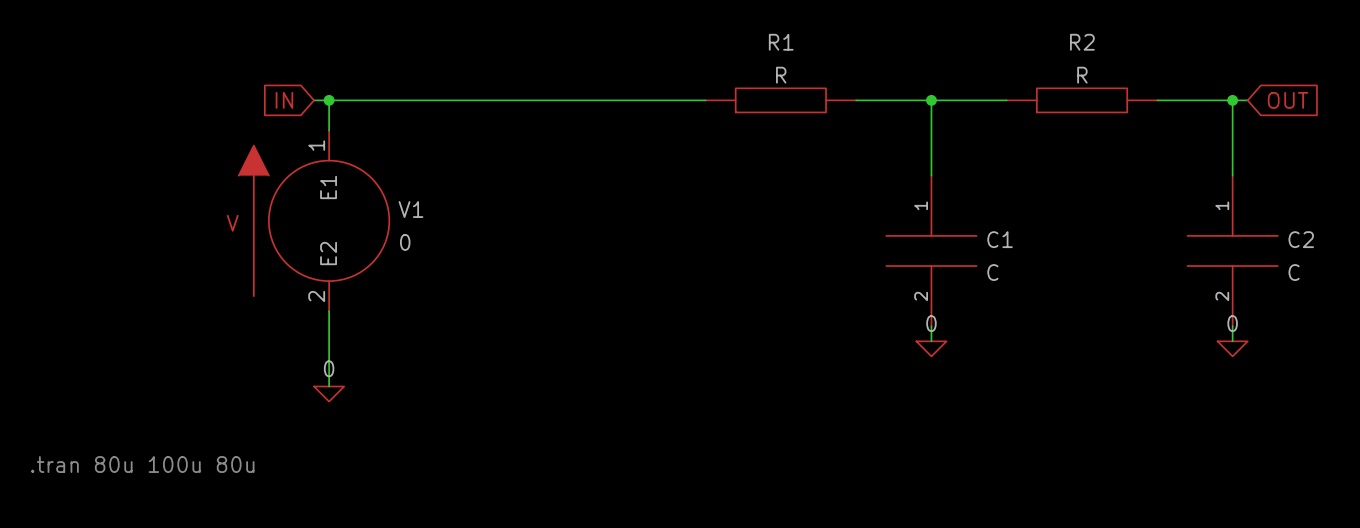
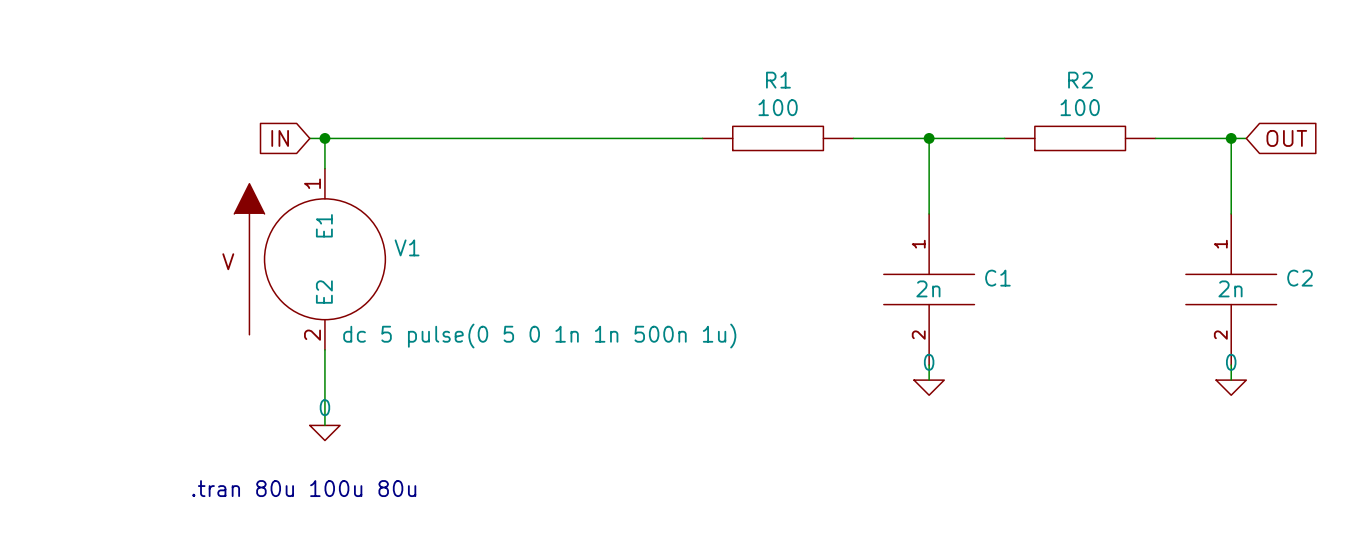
R1 text: none -> 100 (778, 107)
R2 text: none -> 100 (1080, 107)
R1 value: R (781, 75) -> none
R2 value: R (1082, 75) -> none
V1 value: 0 (405, 242) -> none
C1 text: none -> 2n (928, 288)
C2 text: none -> 2n (1230, 288)
C1 value: C (992, 272) -> none
C2 value: C (1294, 272) -> none
V1 text: none -> dc 5 pulse(0 5 0 1n 1n 500n 1u) (539, 336)
text position: .tran 80u 100u 80u (142, 464) -> .tran 80u 100u 80u (304, 488)

